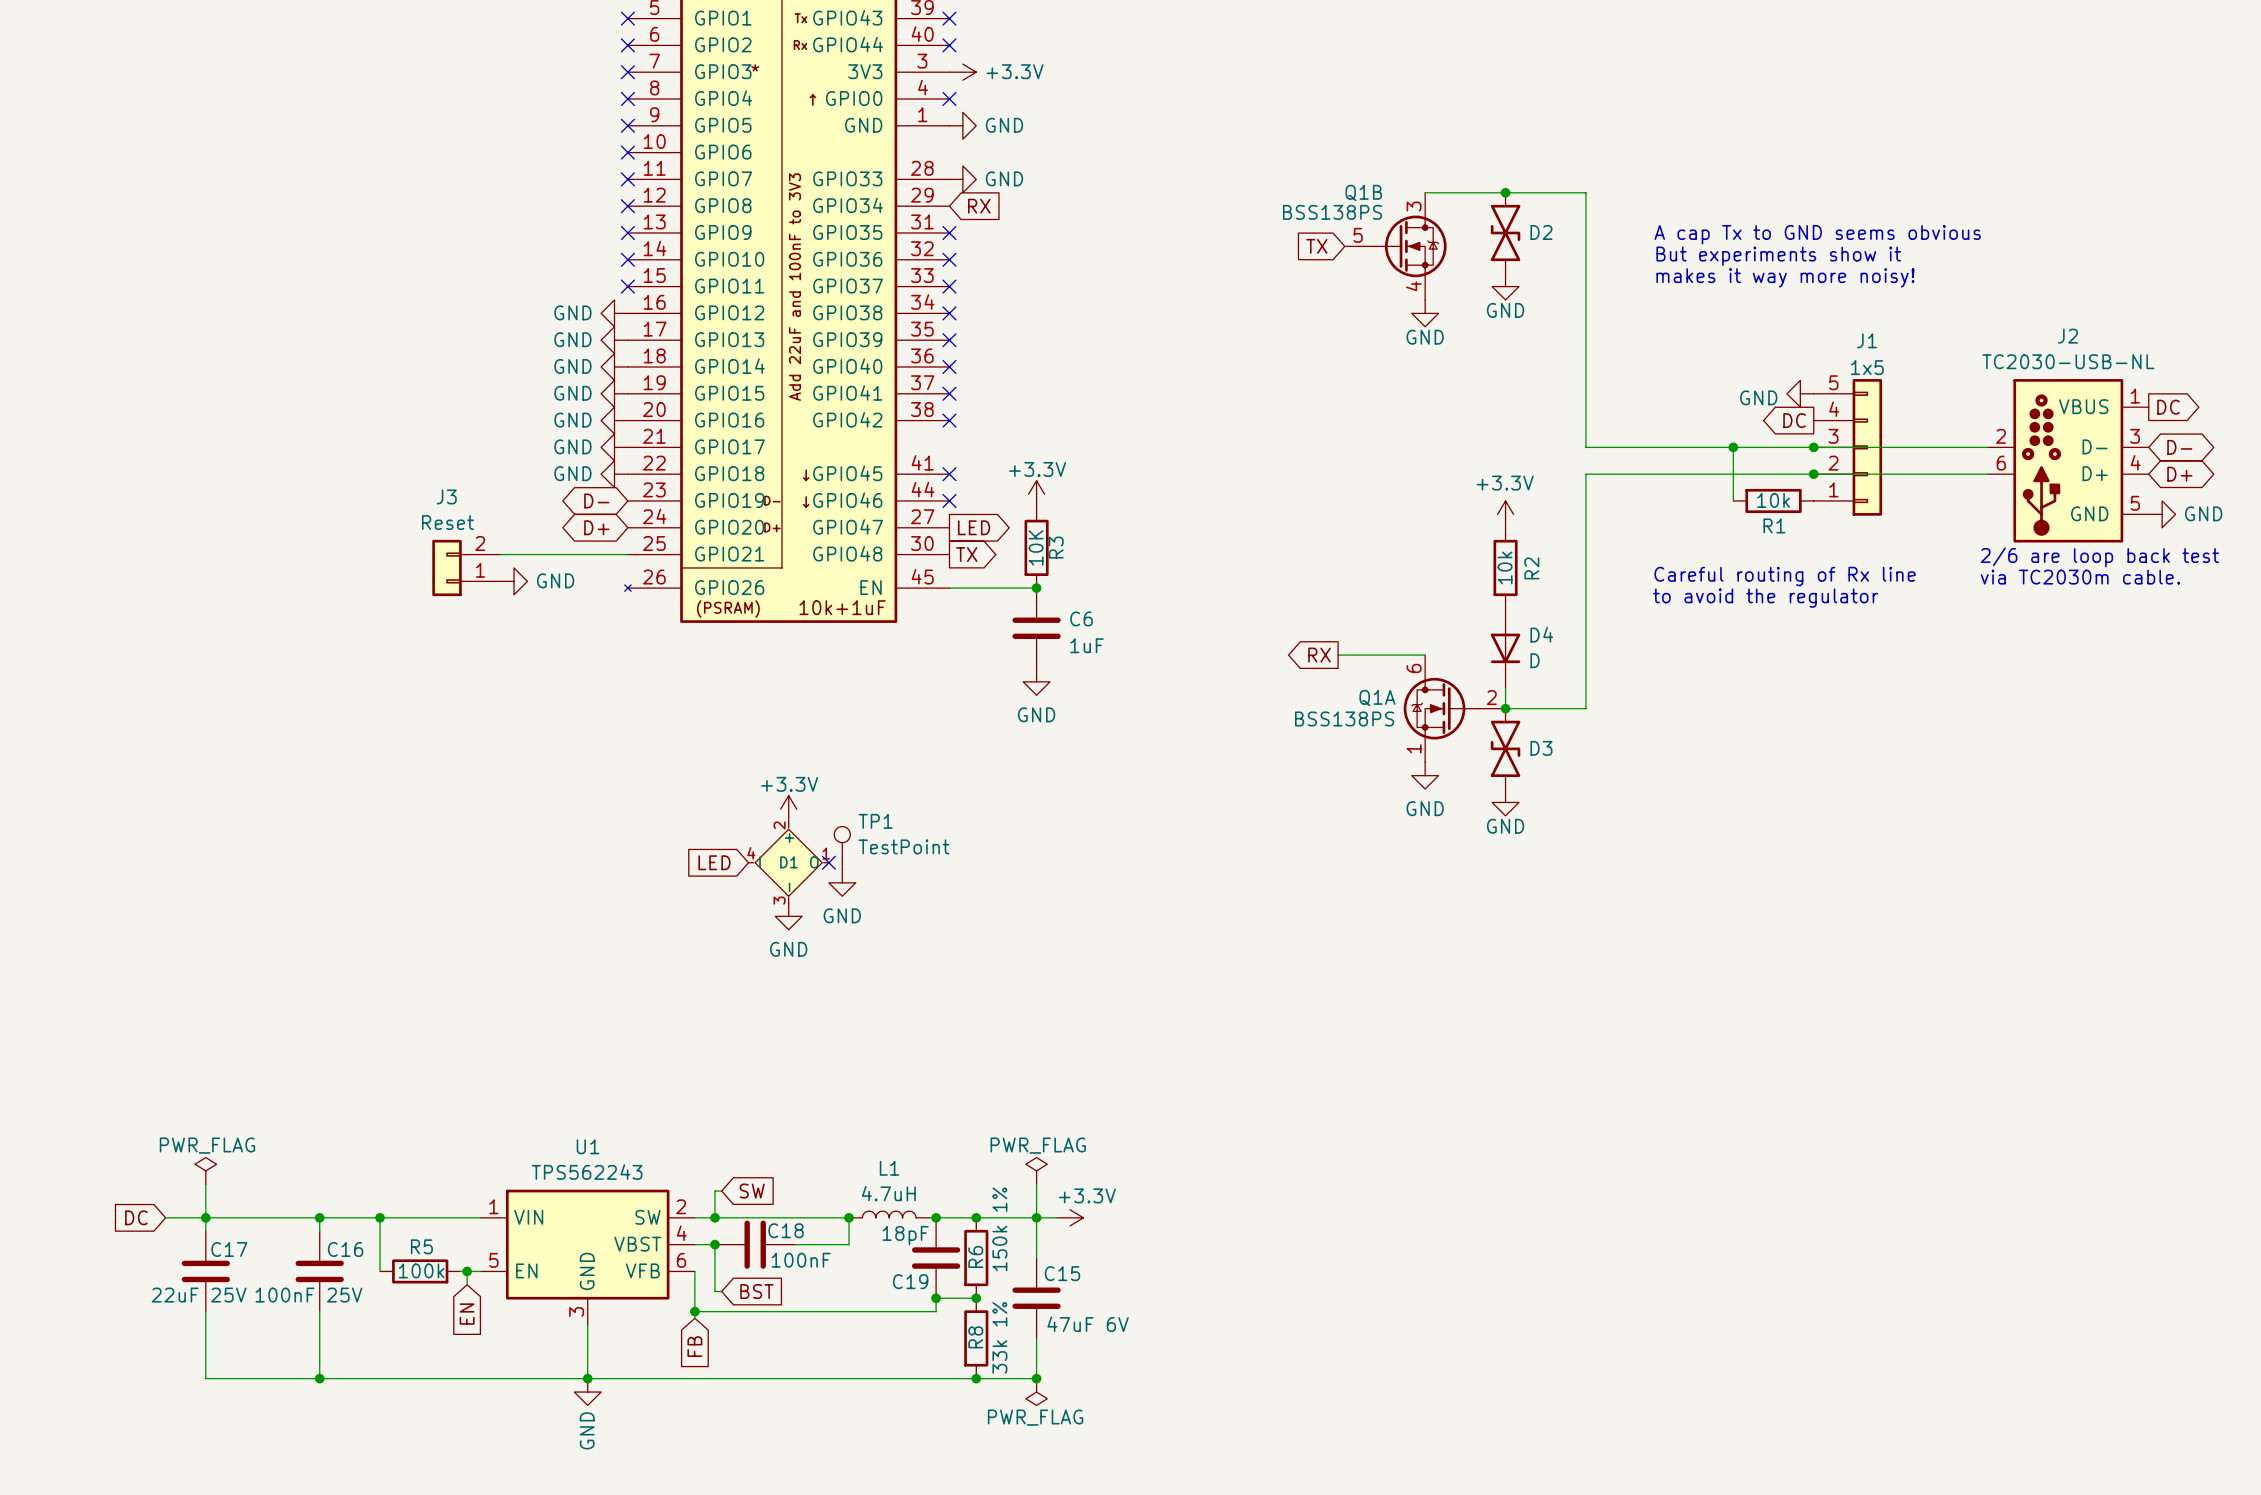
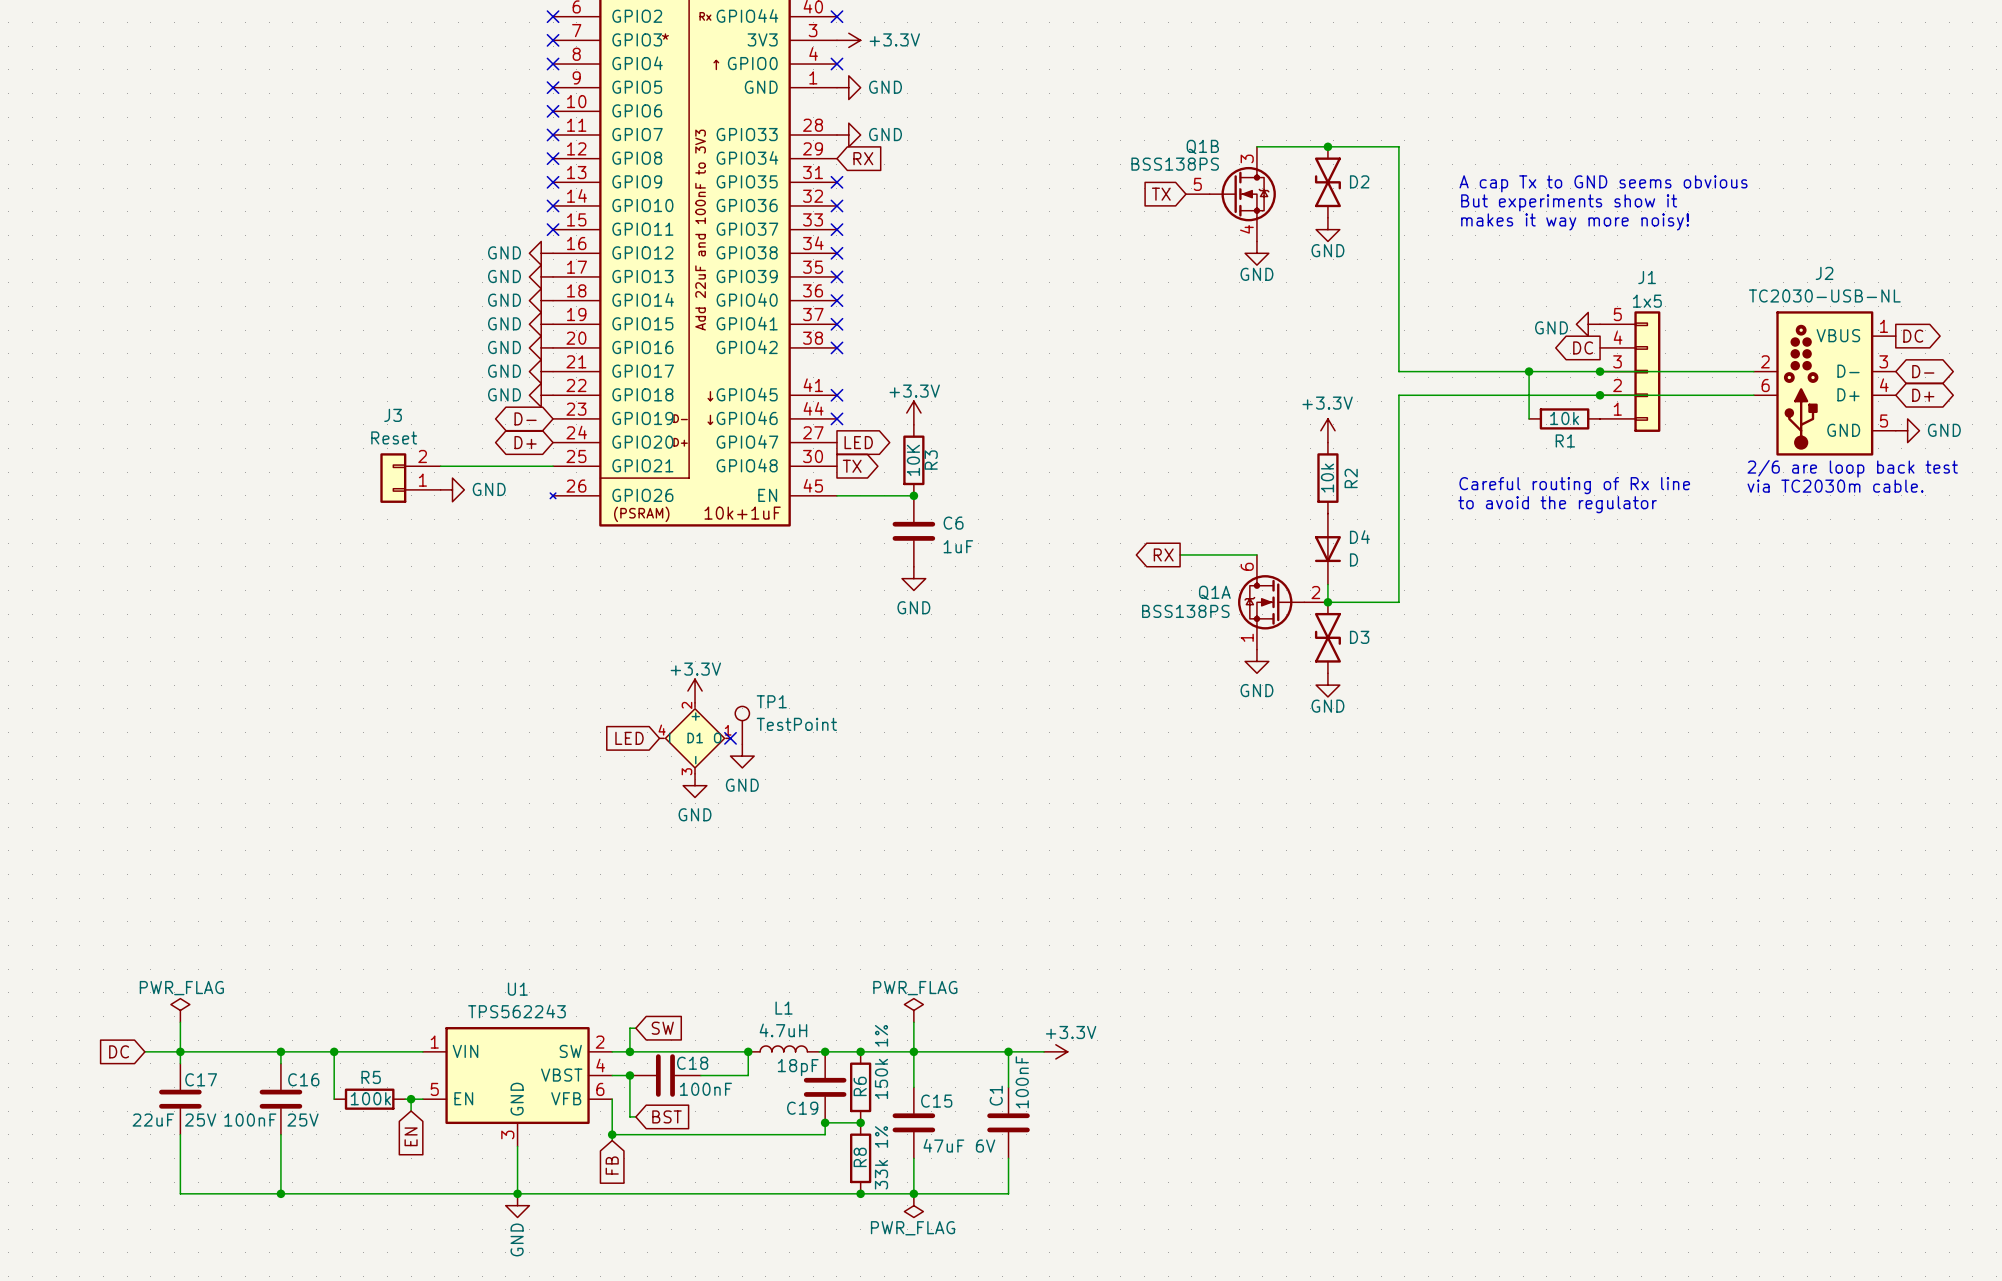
wire: none -> (931, 1051) (1044, 1051)
power symbol position: +3.3V (1070, 1217) -> +3.3V (1055, 1051)
wire: none -> (1008, 1051) (1008, 1087)
junction: none -> (1008, 1051)
C1: none -> 100nF (1008, 1122)
wire: none -> (1008, 1158) (1008, 1193) (913, 1193)

